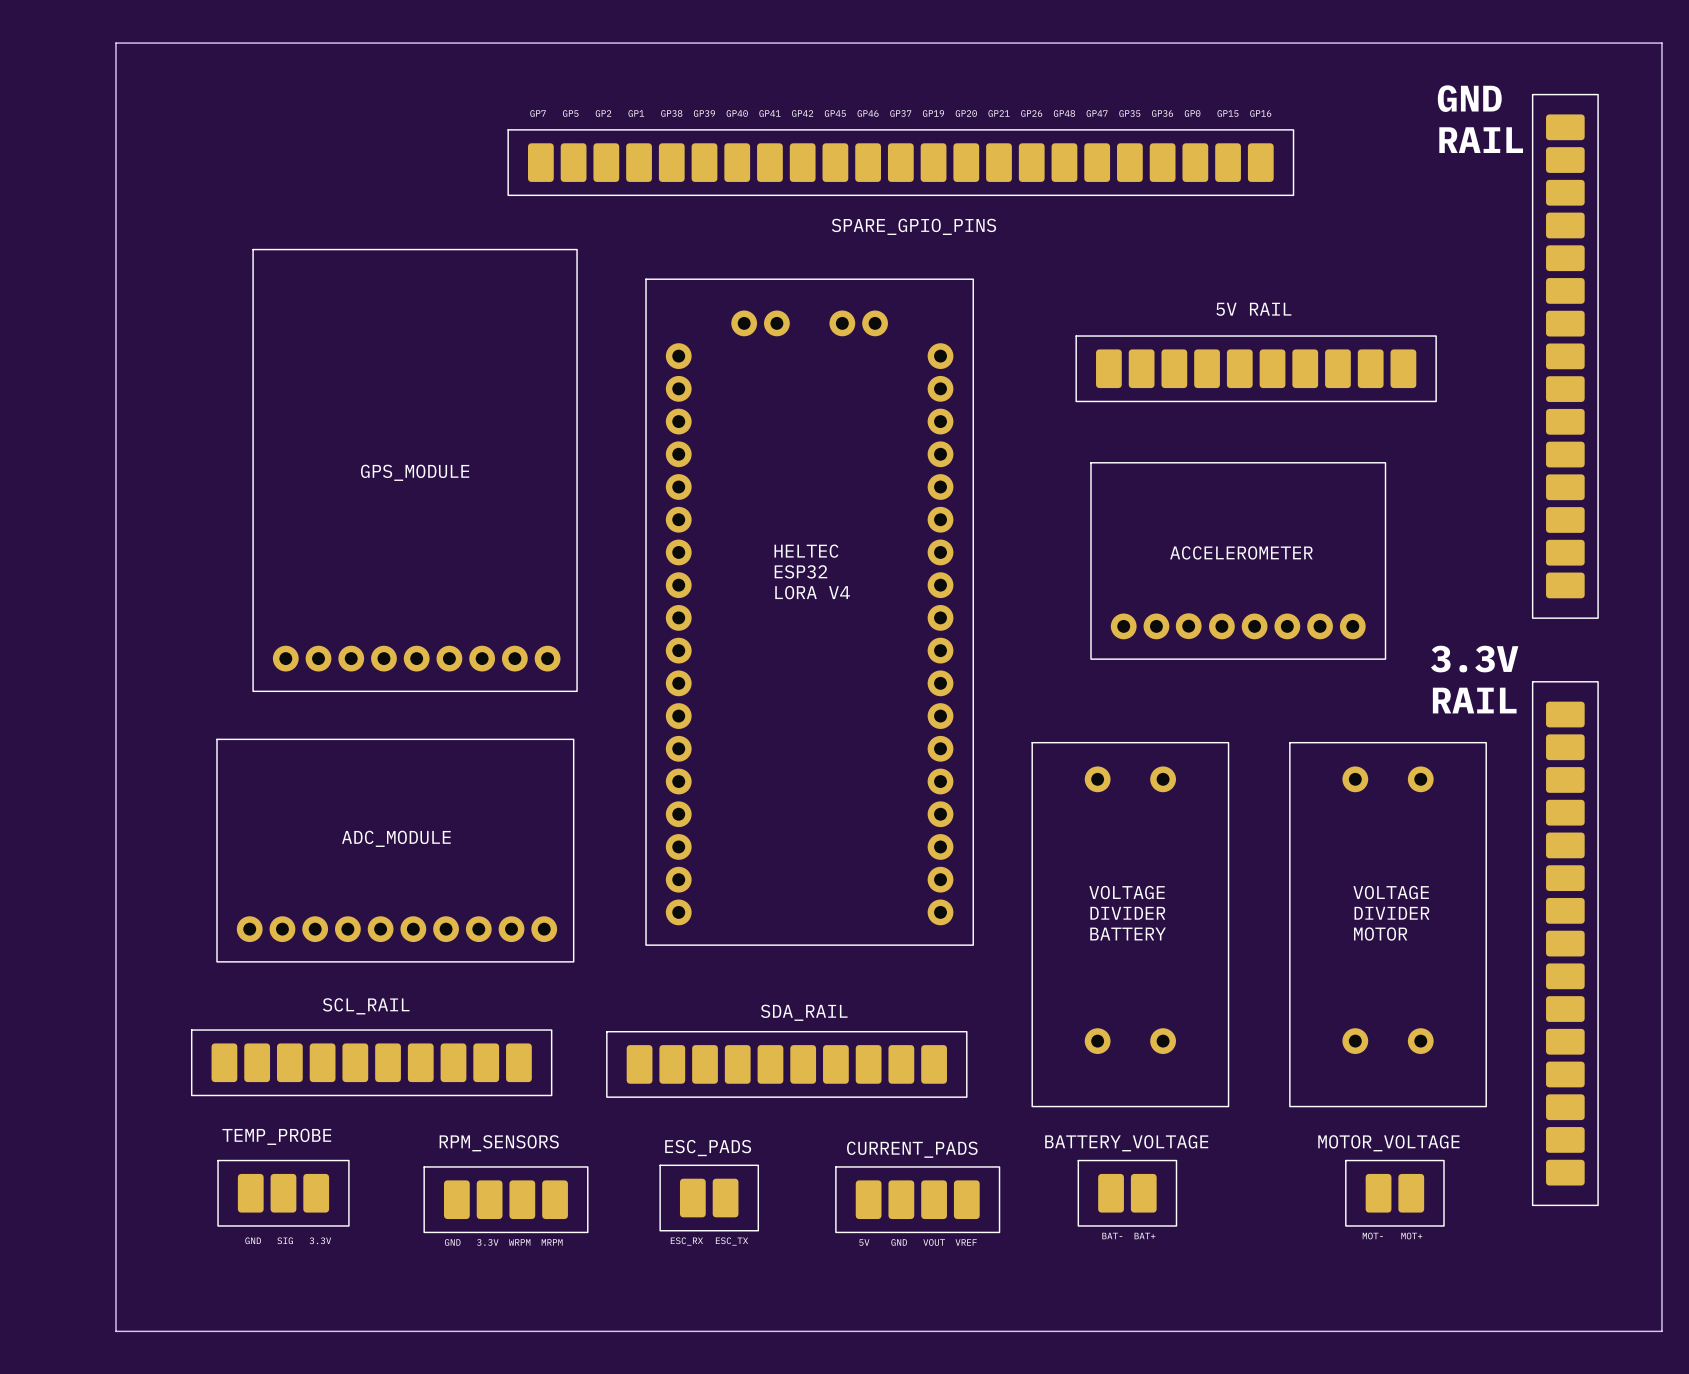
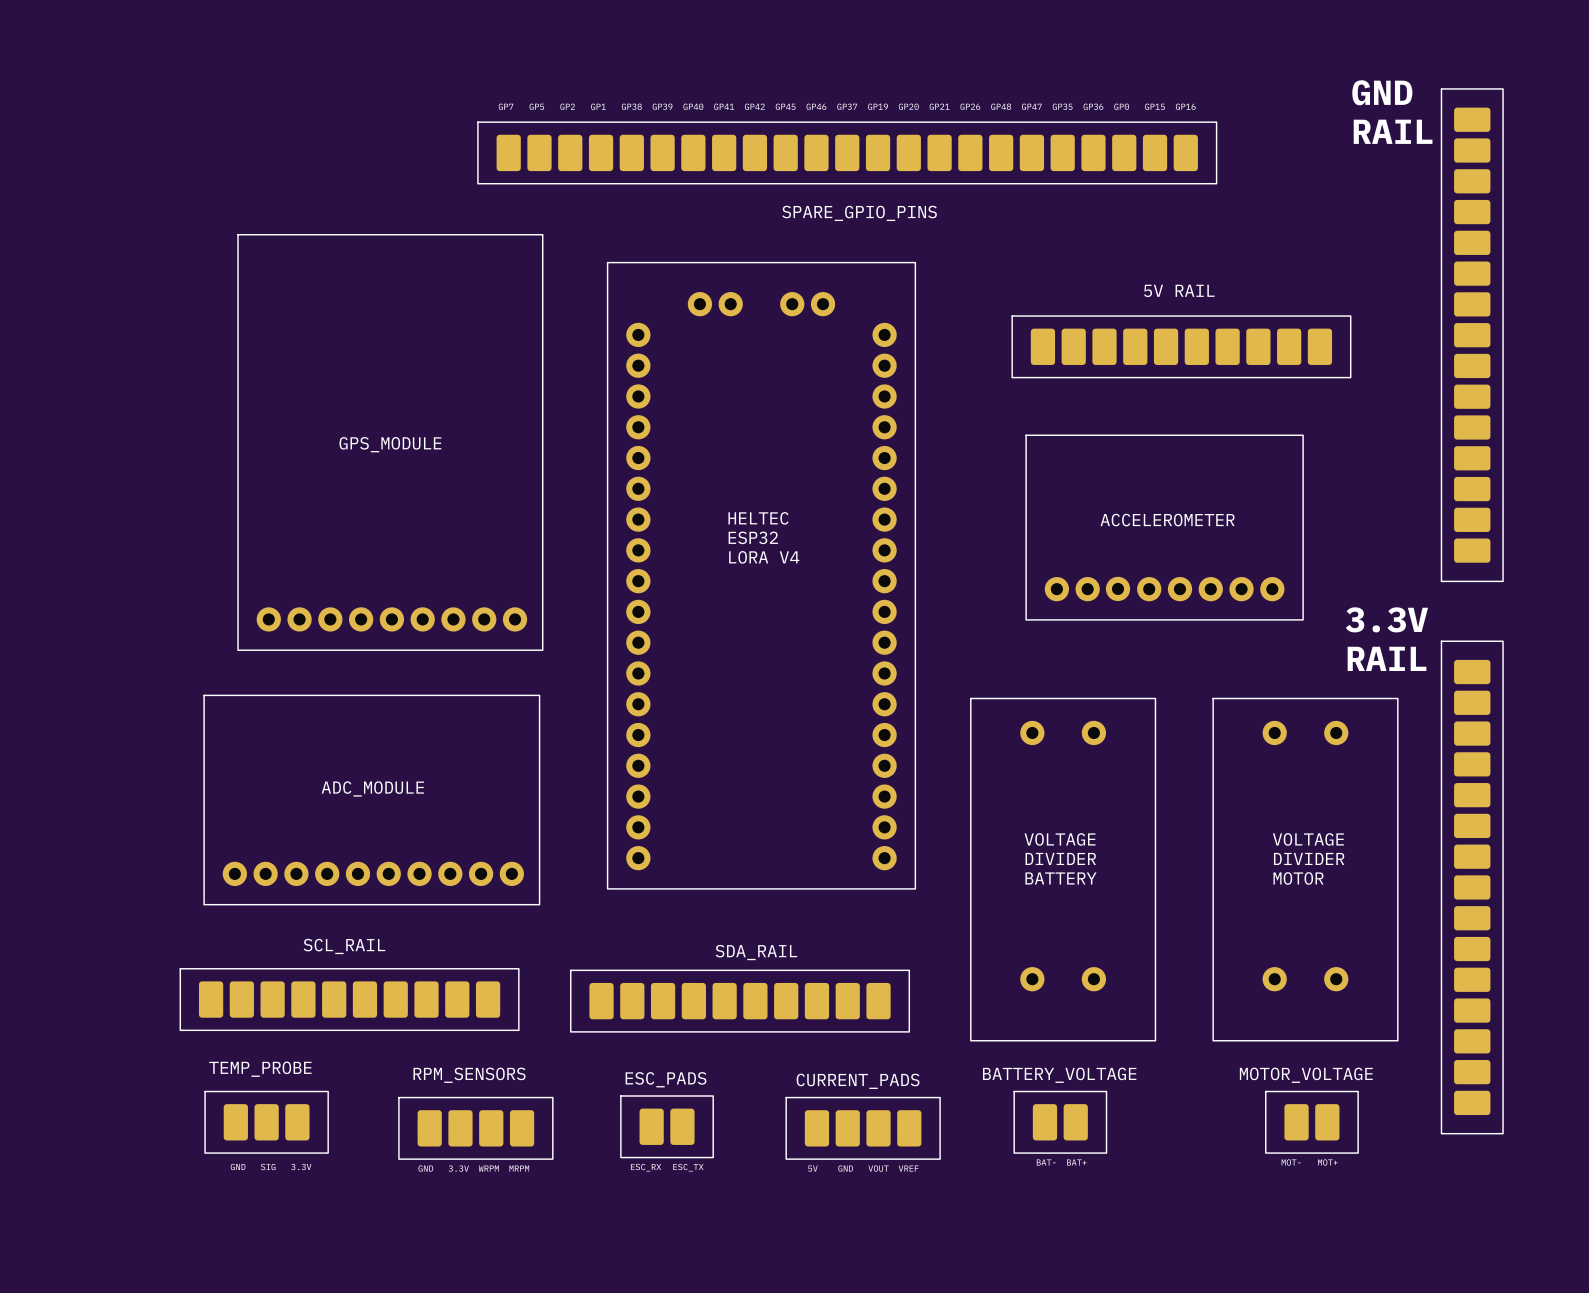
board edge: (115, 43) (1661, 43) (1661, 1331) (115, 1331) (115, 43) -> none

